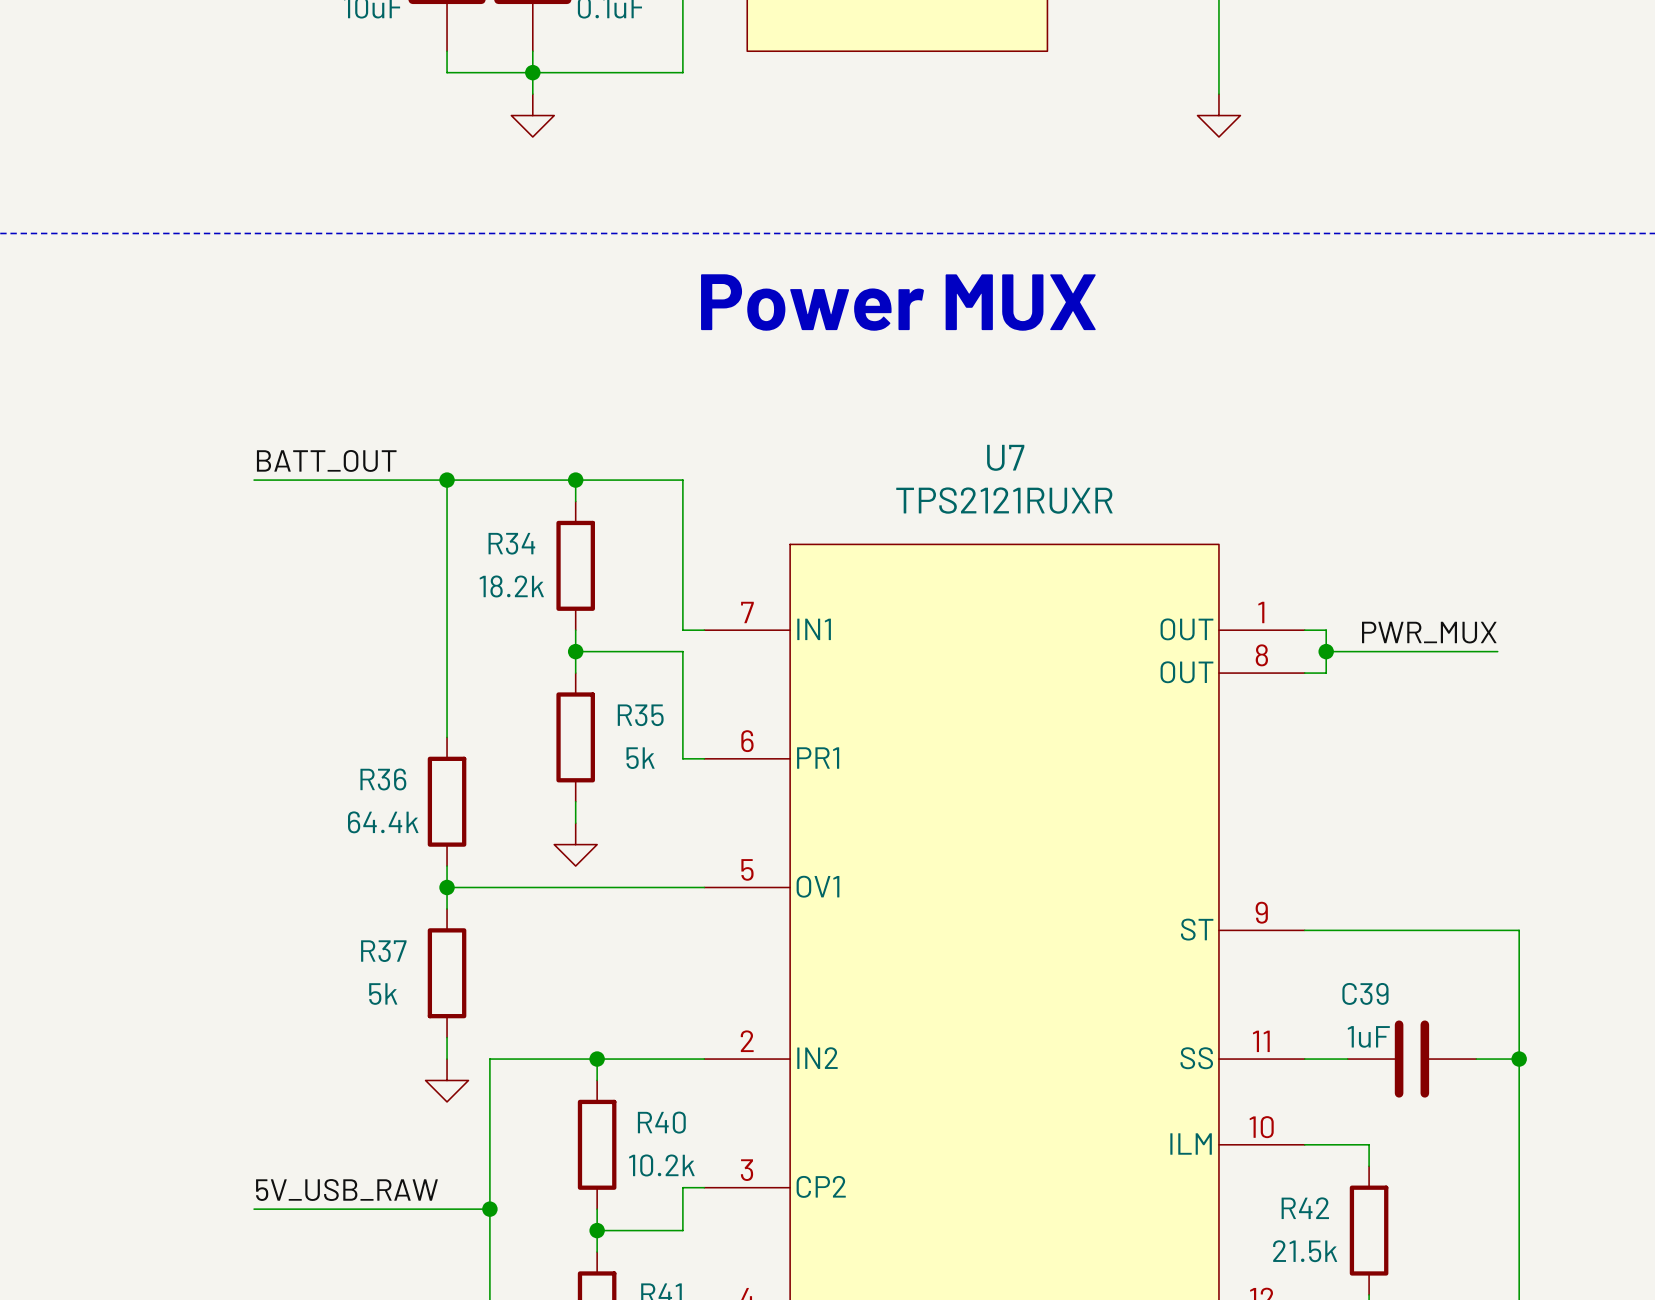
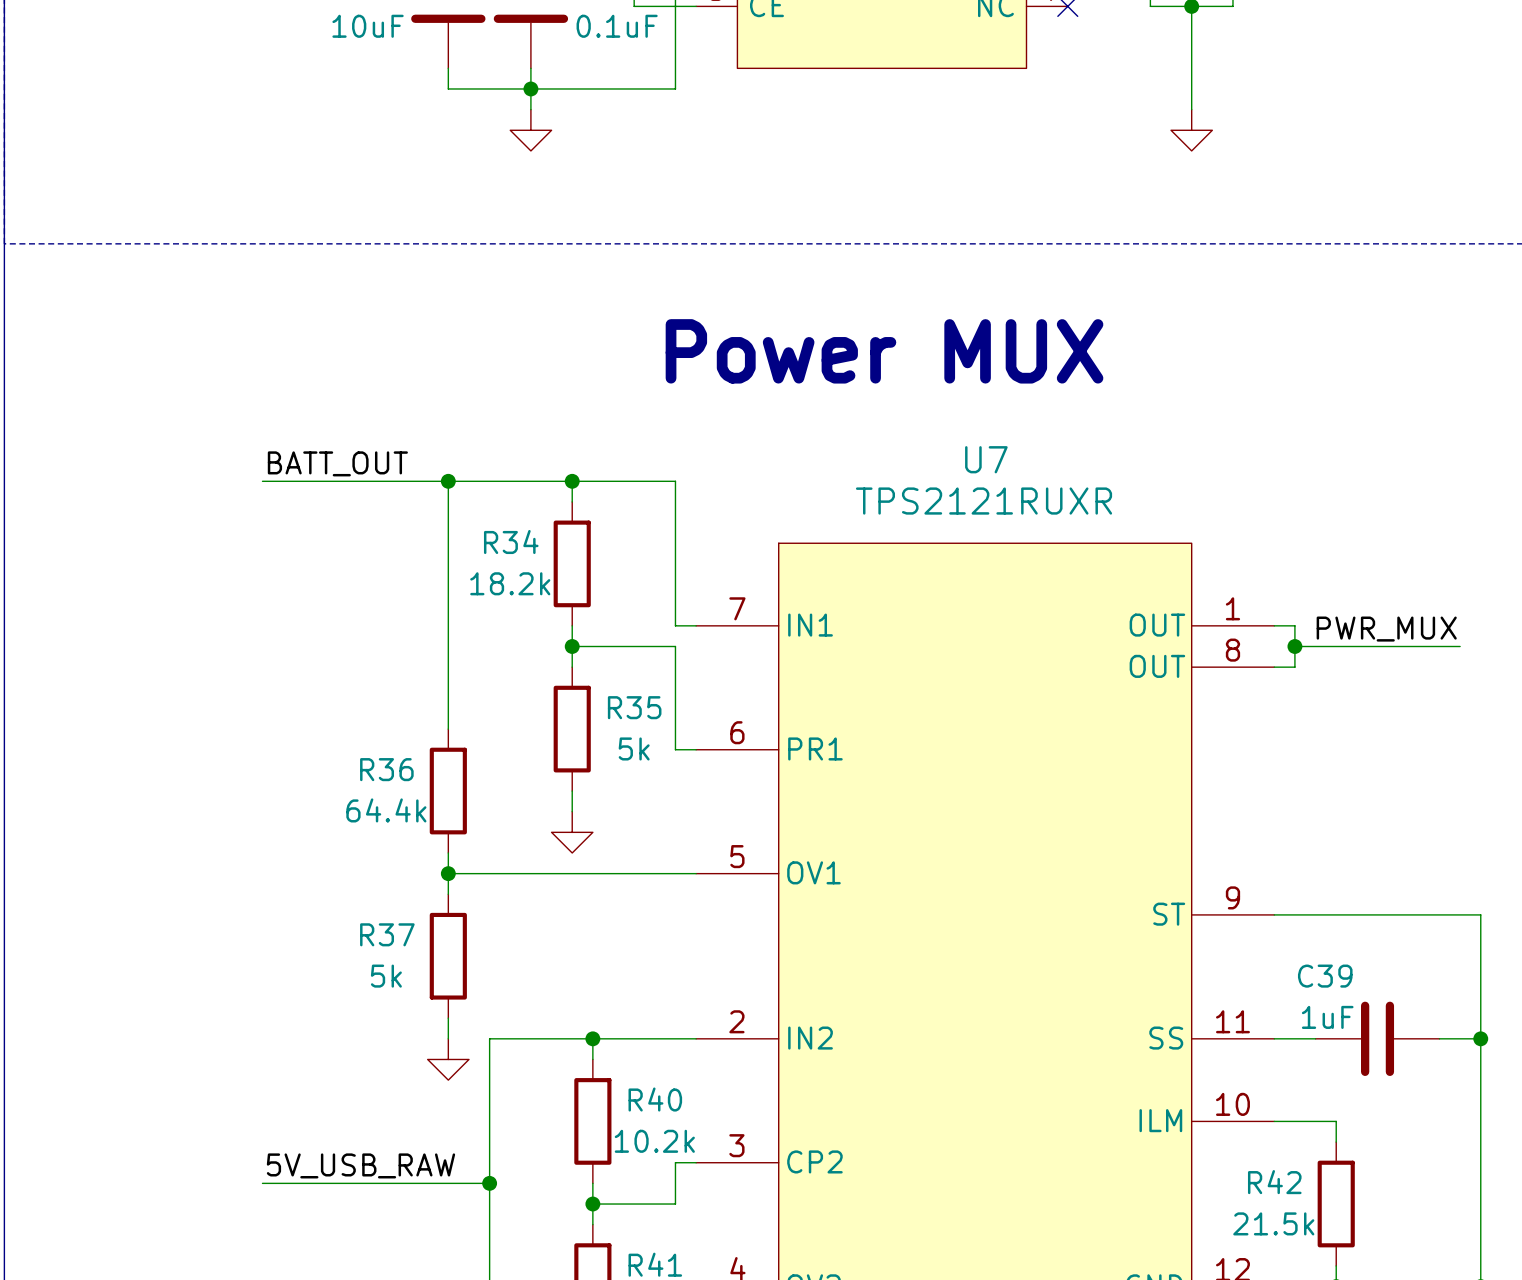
text position: Power MUX (898, 302) -> Power MUX (884, 351)

